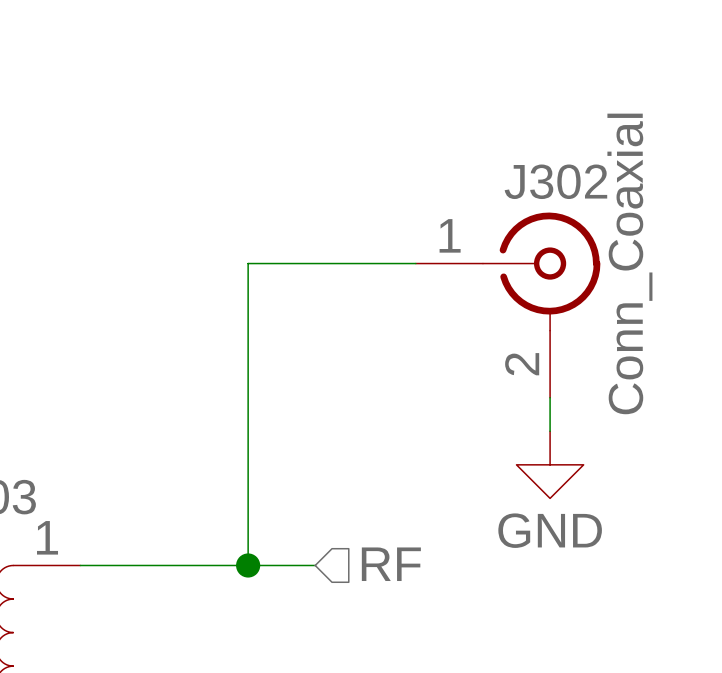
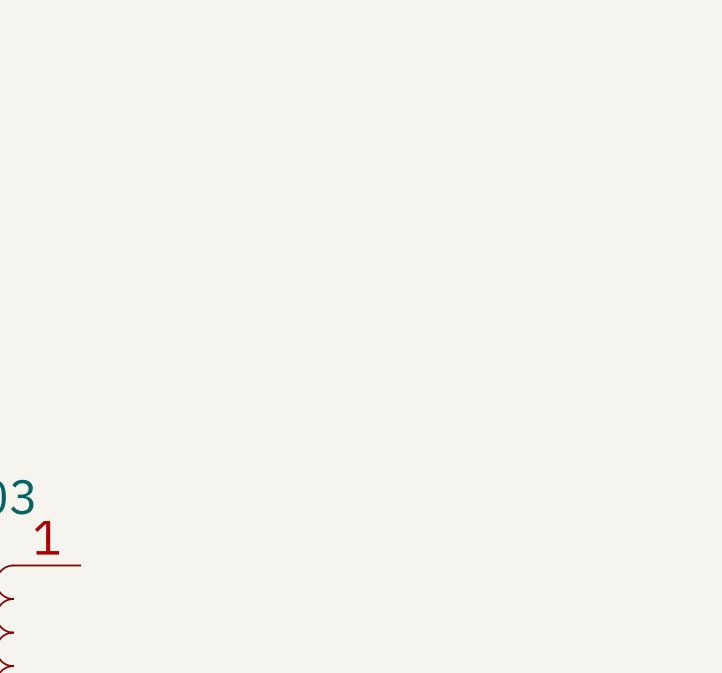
wire: (415, 263) (248, 263) (248, 565) -> none
J302: Conn_Coaxial (508, 305) -> none
wire: (550, 397) (550, 431) -> none
power symbol: GND (550, 464) -> none
hierarchical label: RF (391, 564) -> none
wire: (80, 565) (315, 565) -> none
junction: (248, 565) -> none

